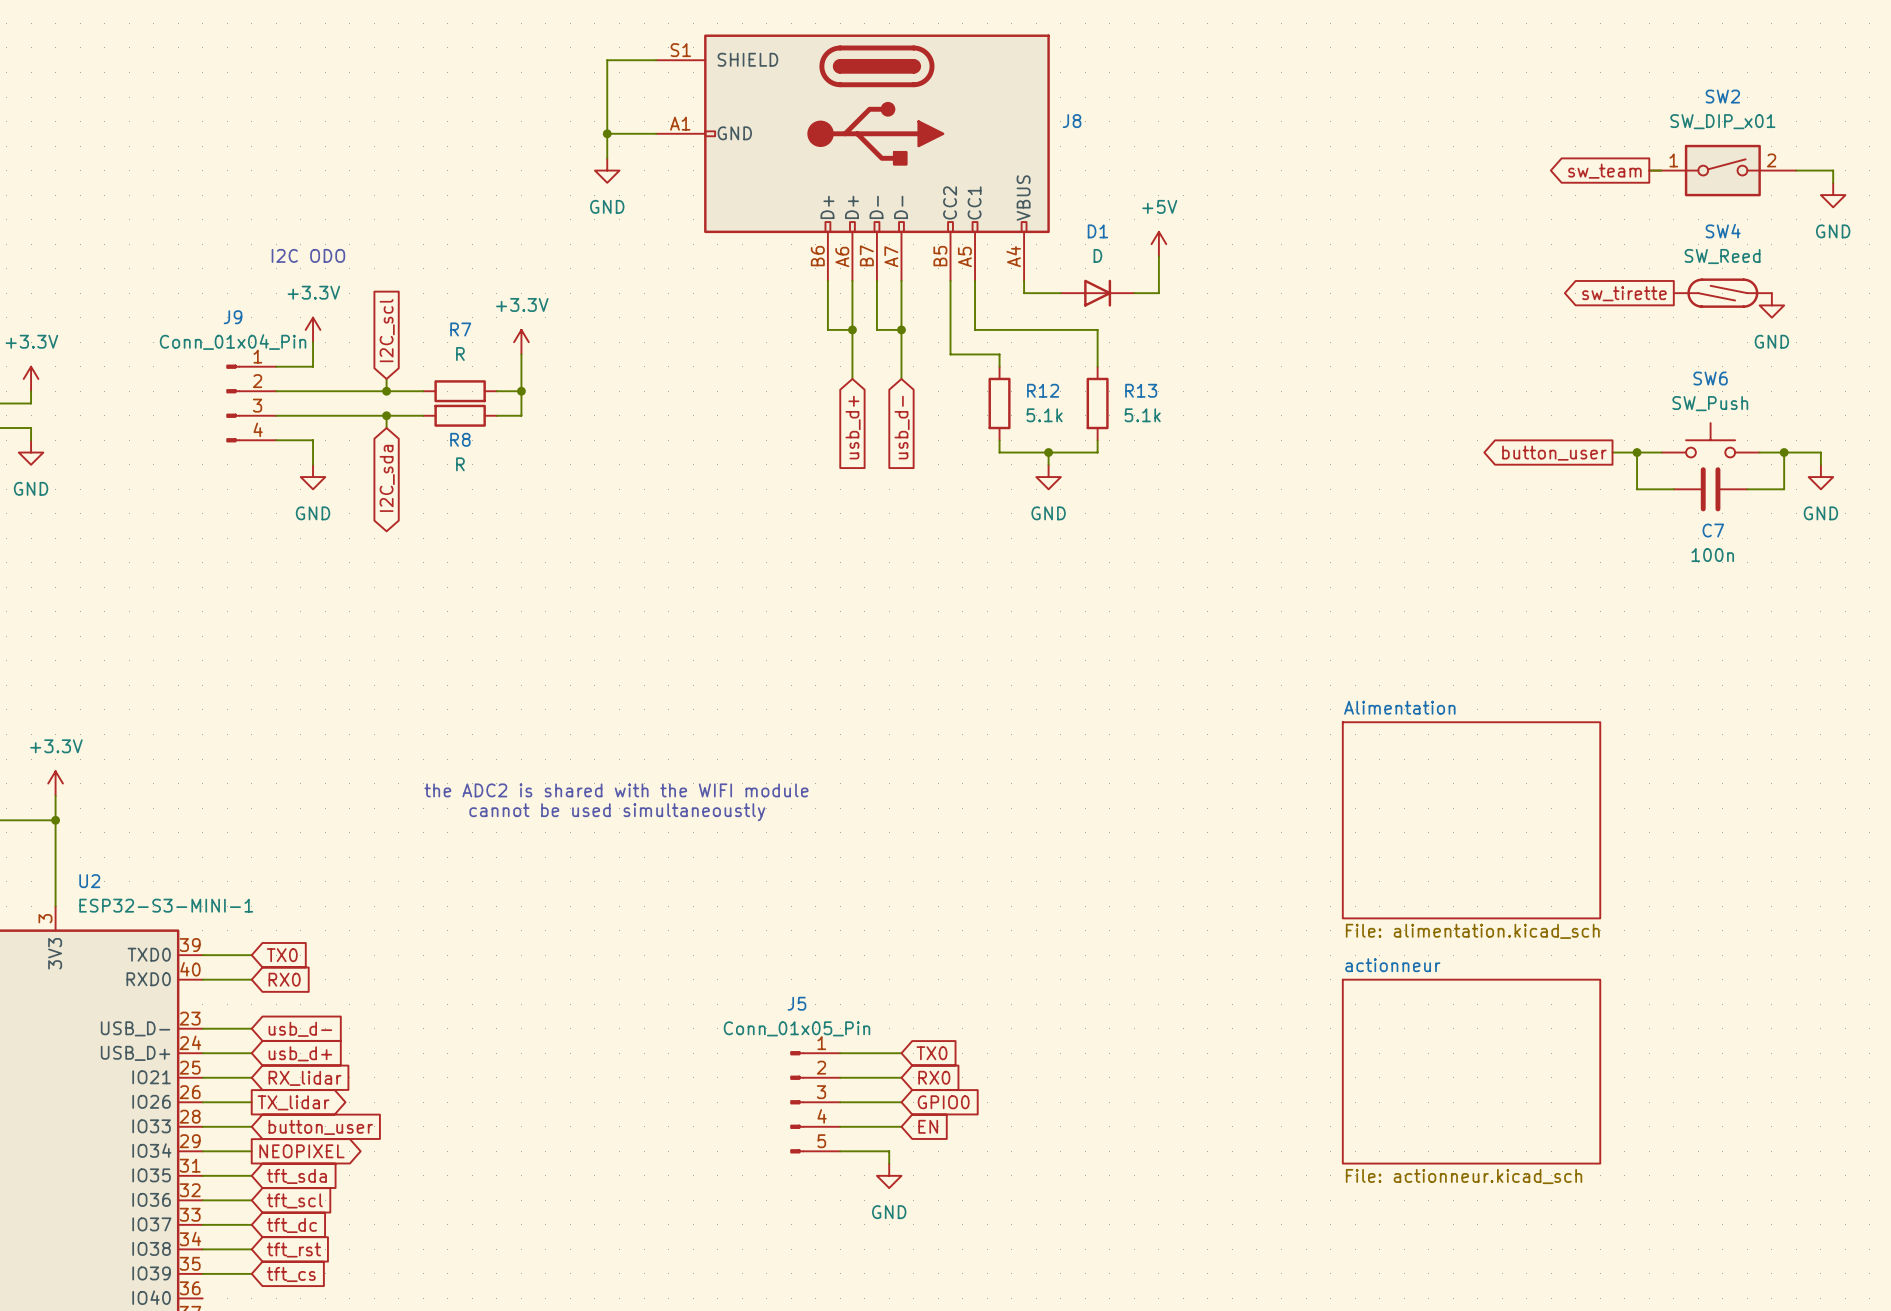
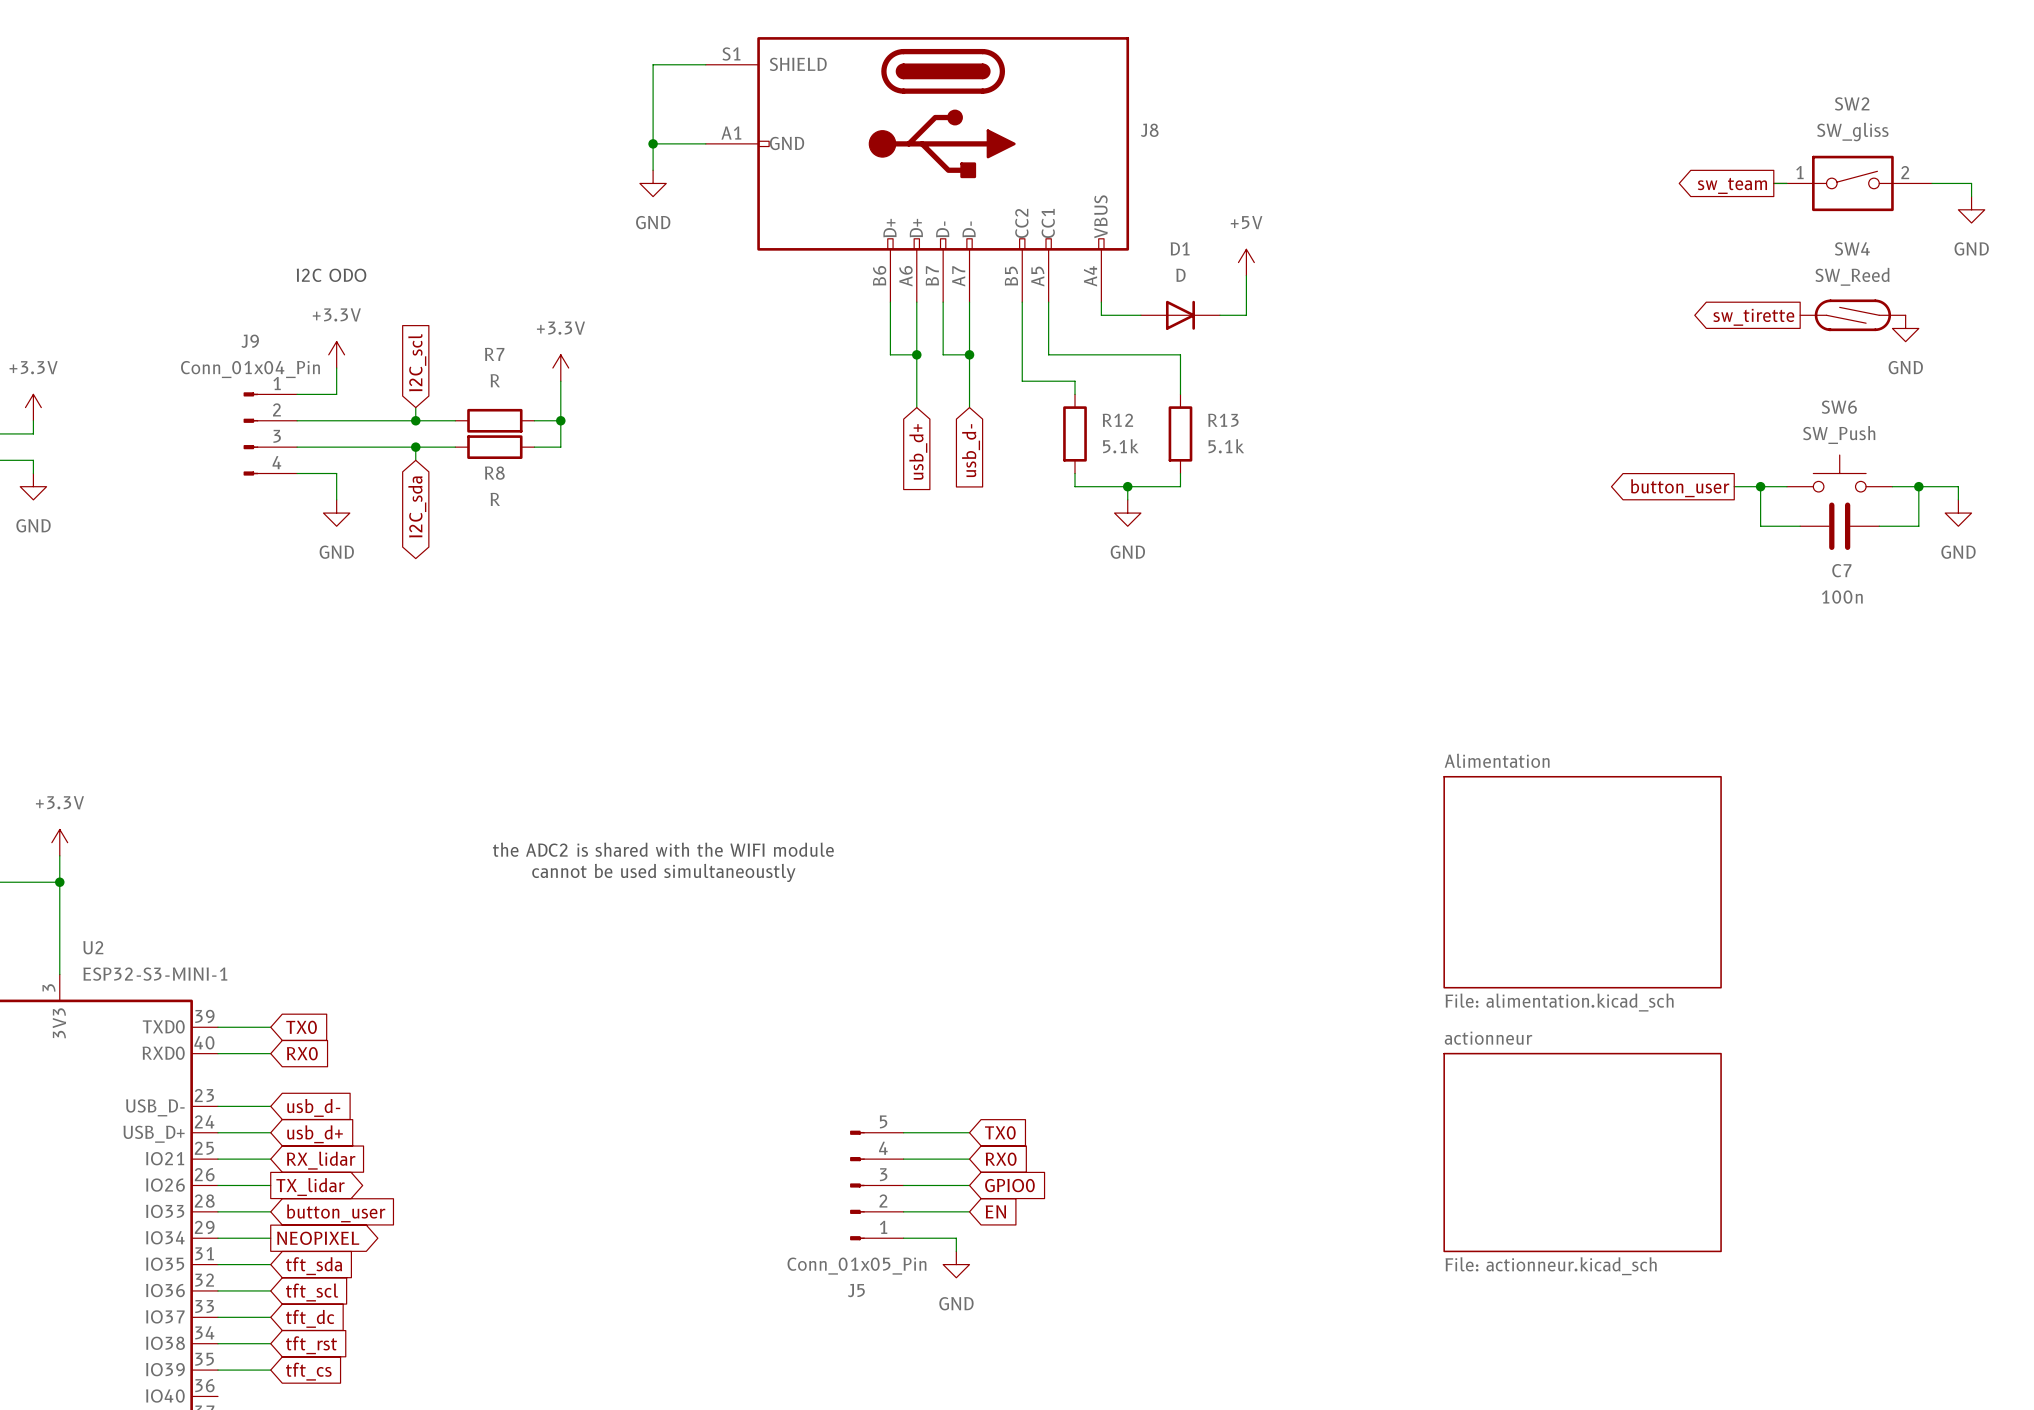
SW2 value: SW_DIP_x01 (1722, 121) -> SW_gliss (1852, 132)
J5 flip: as is (797, 1102) -> up-down (857, 1185)

